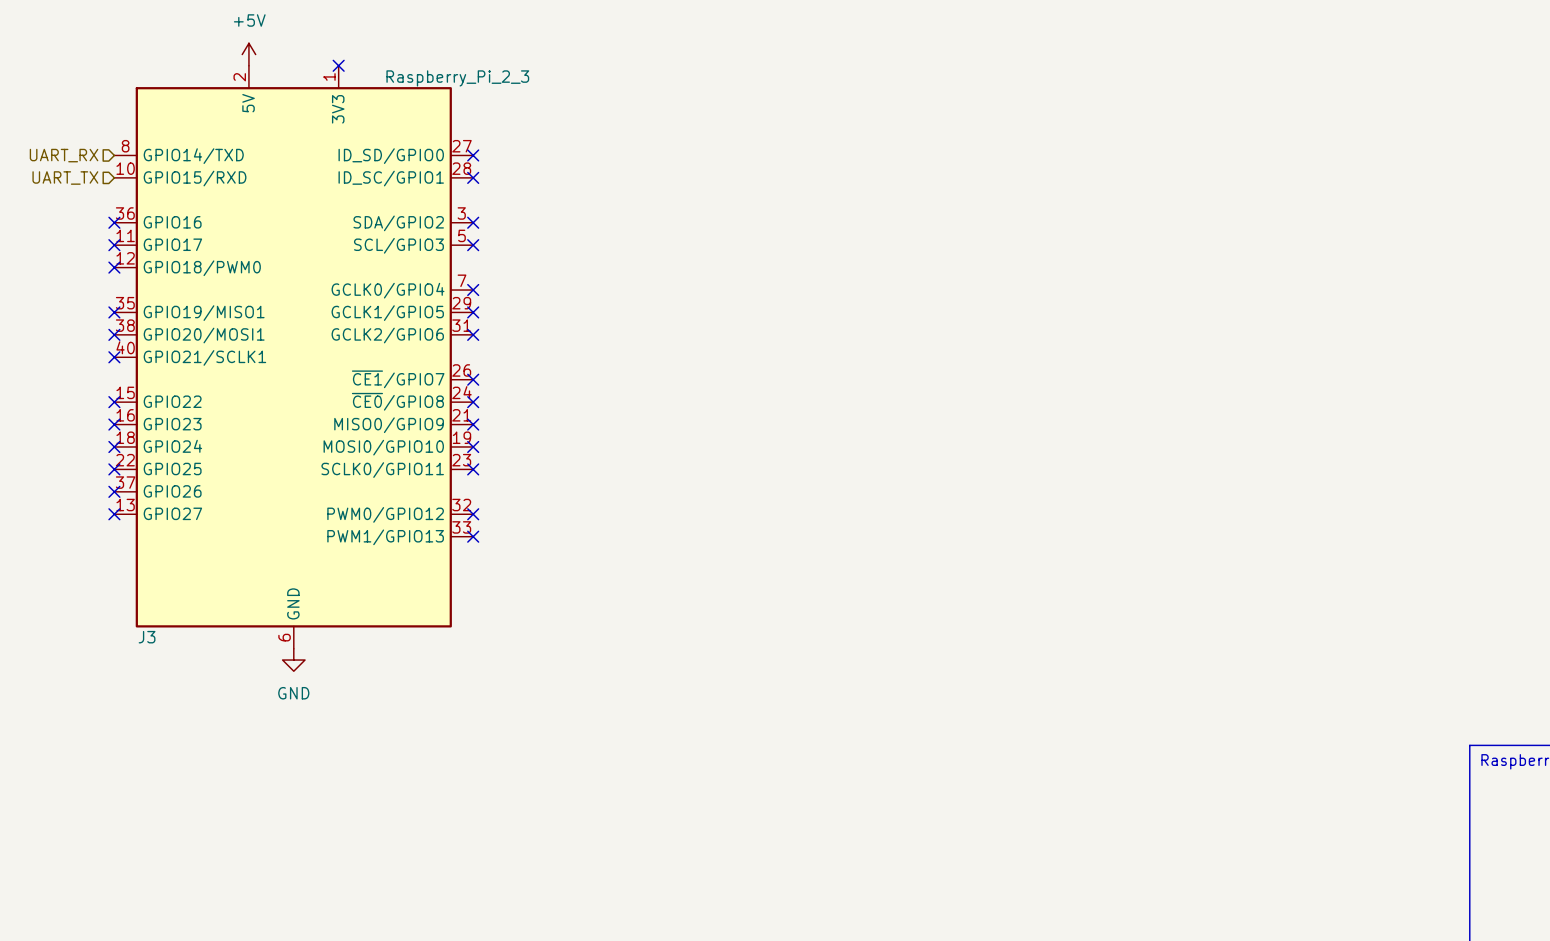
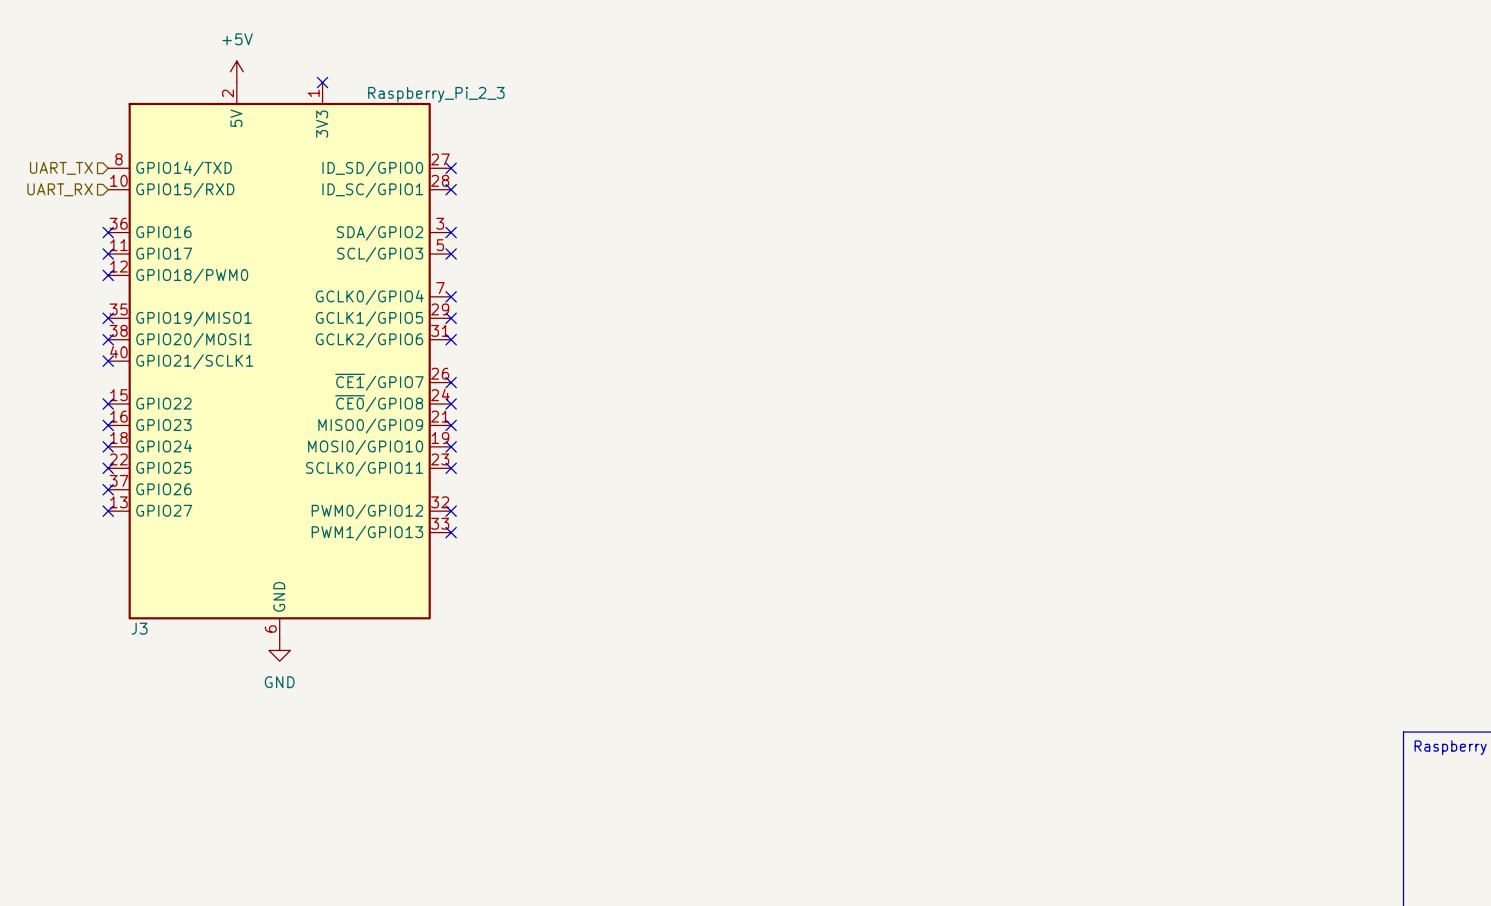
hierarchical label: UART_RX (64, 155) -> UART_TX (61, 168)
hierarchical label: UART_TX (65, 178) -> UART_RX (60, 189)

